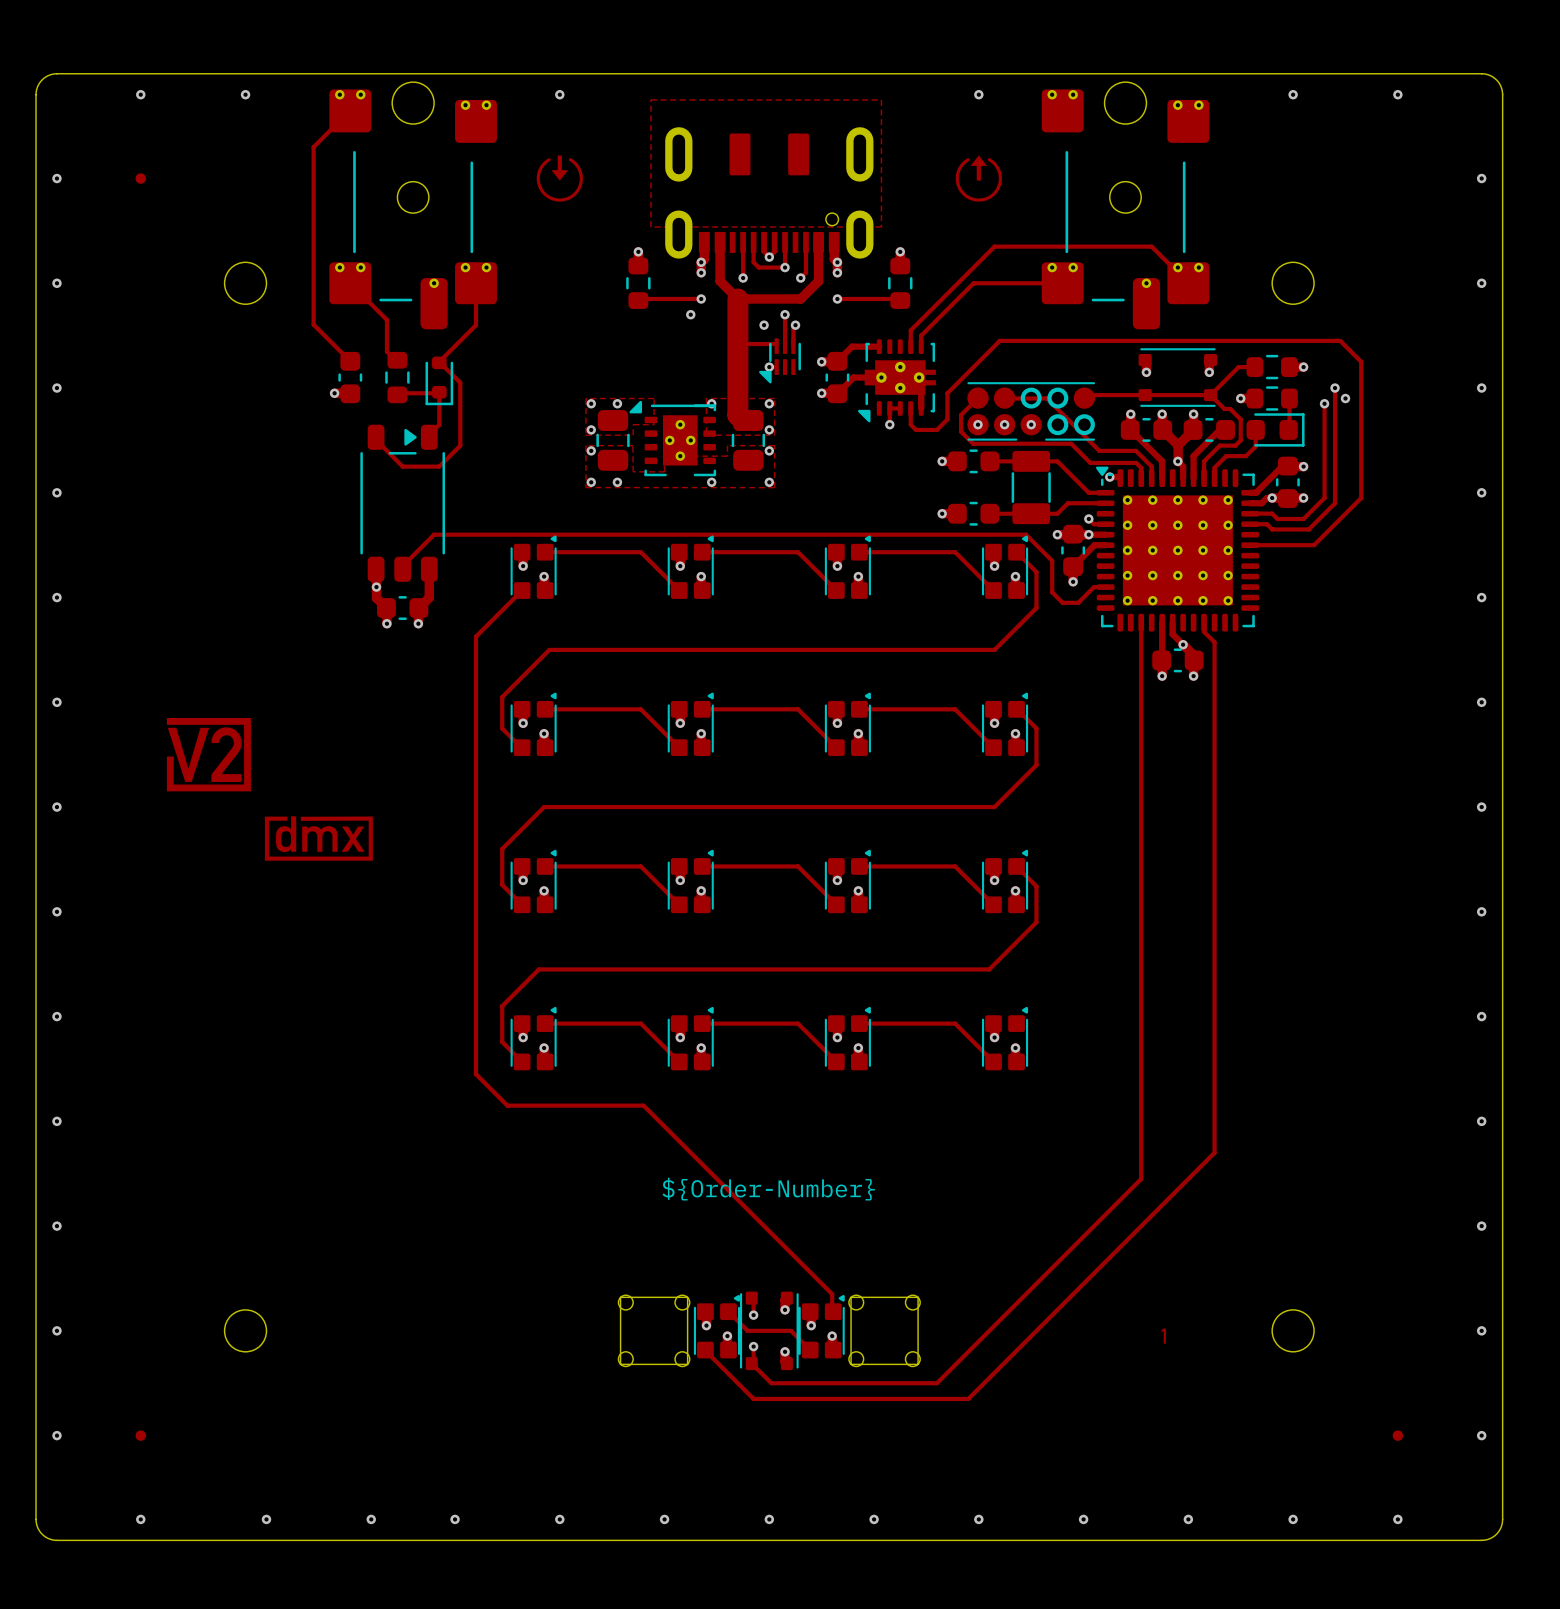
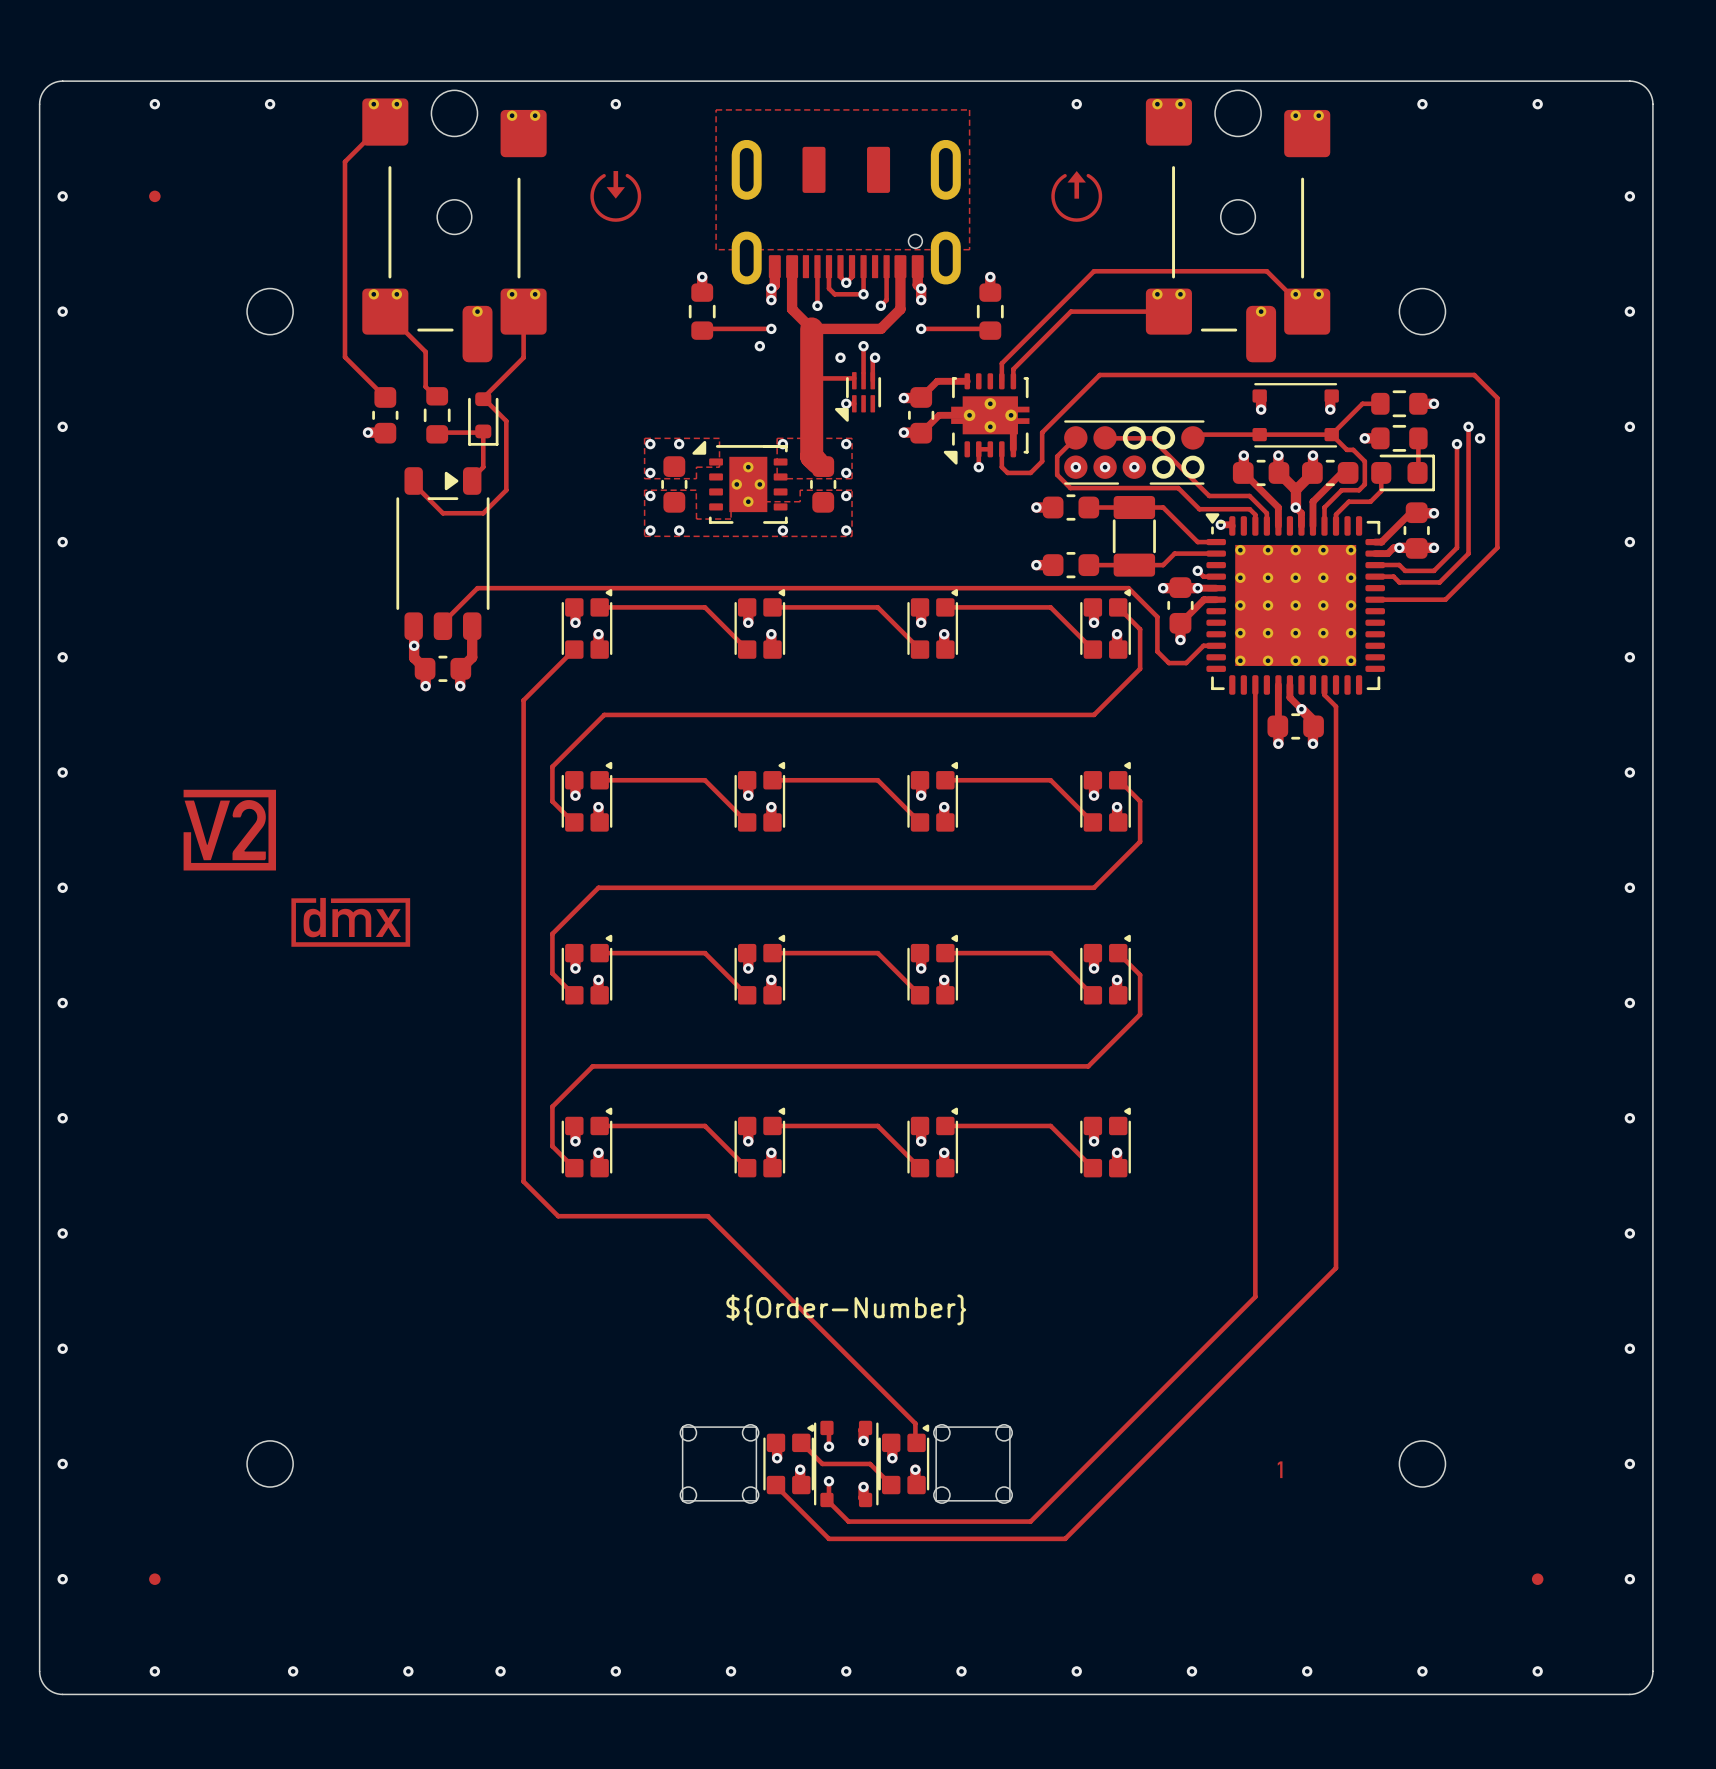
part footprint: [596, 410, 630, 471] -> [661, 456, 688, 513]
part footprint: [731, 410, 766, 471] -> [810, 456, 837, 513]

